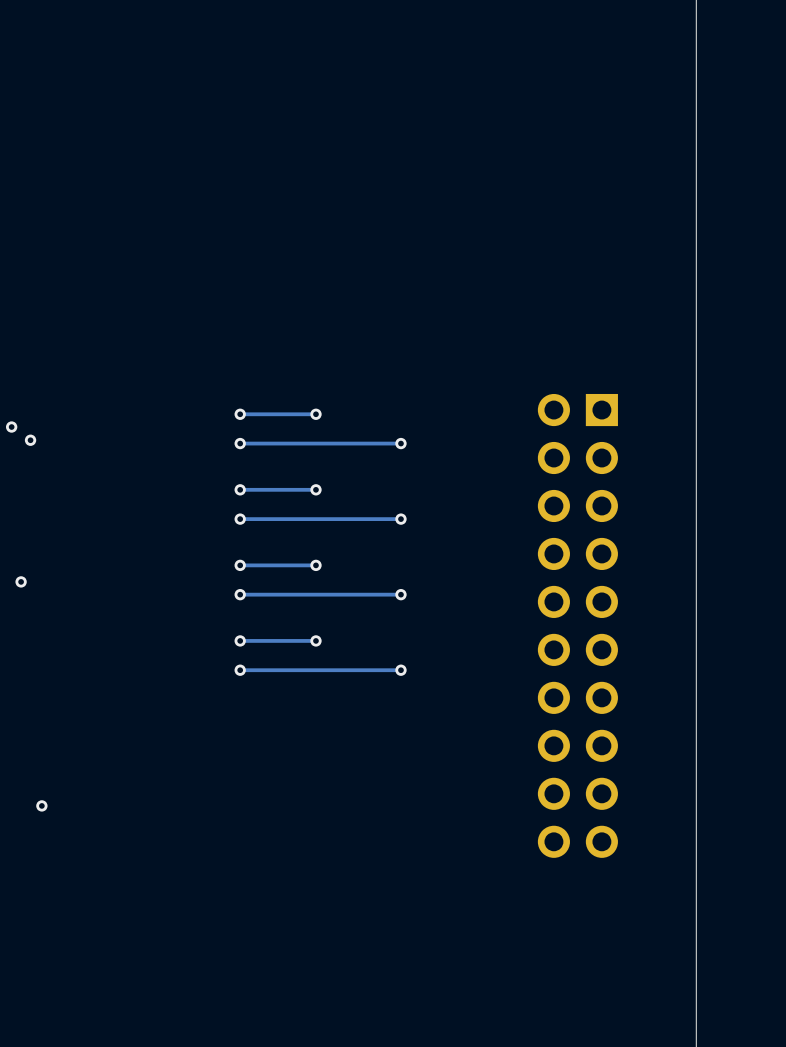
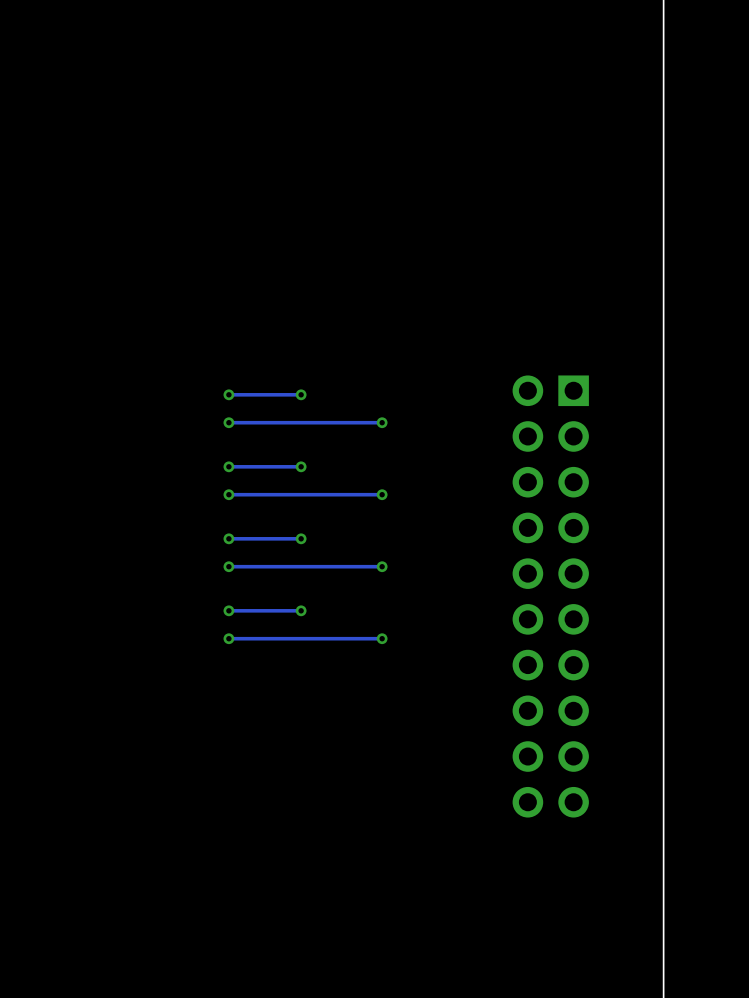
via: (11, 427) -> none
via: (30, 440) -> none
via: (21, 581) -> none
via: (41, 805) -> none

